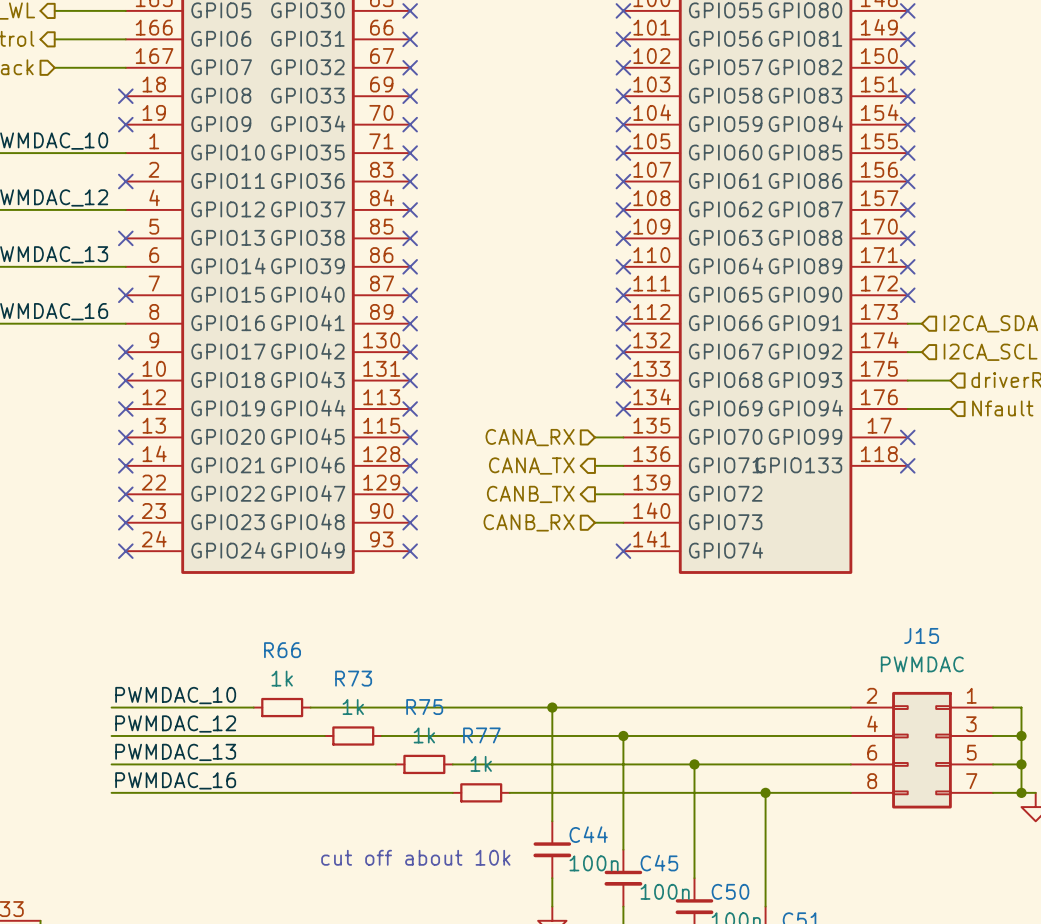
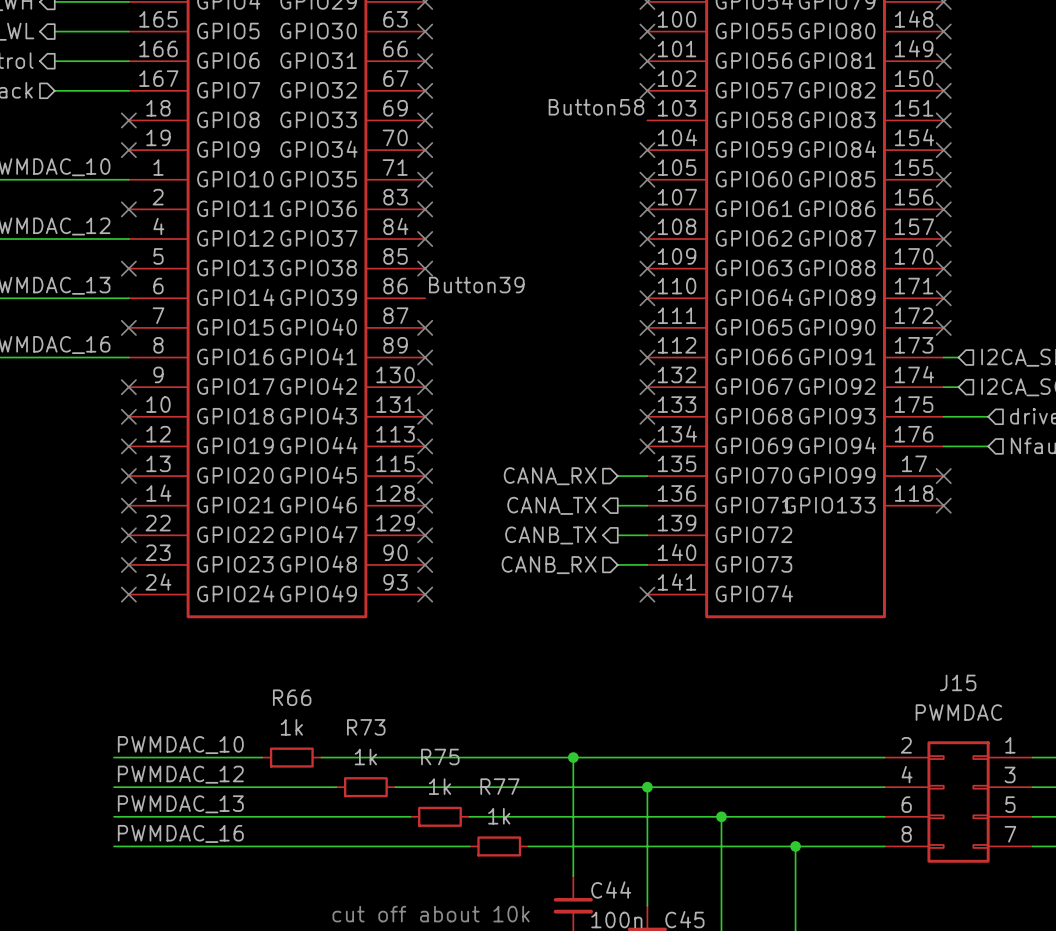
label: none -> Button58 (596, 107)
no-connect mark: (623, 96) -> none
label: none -> Button39 (476, 285)
no-connect mark: (410, 266) -> none

